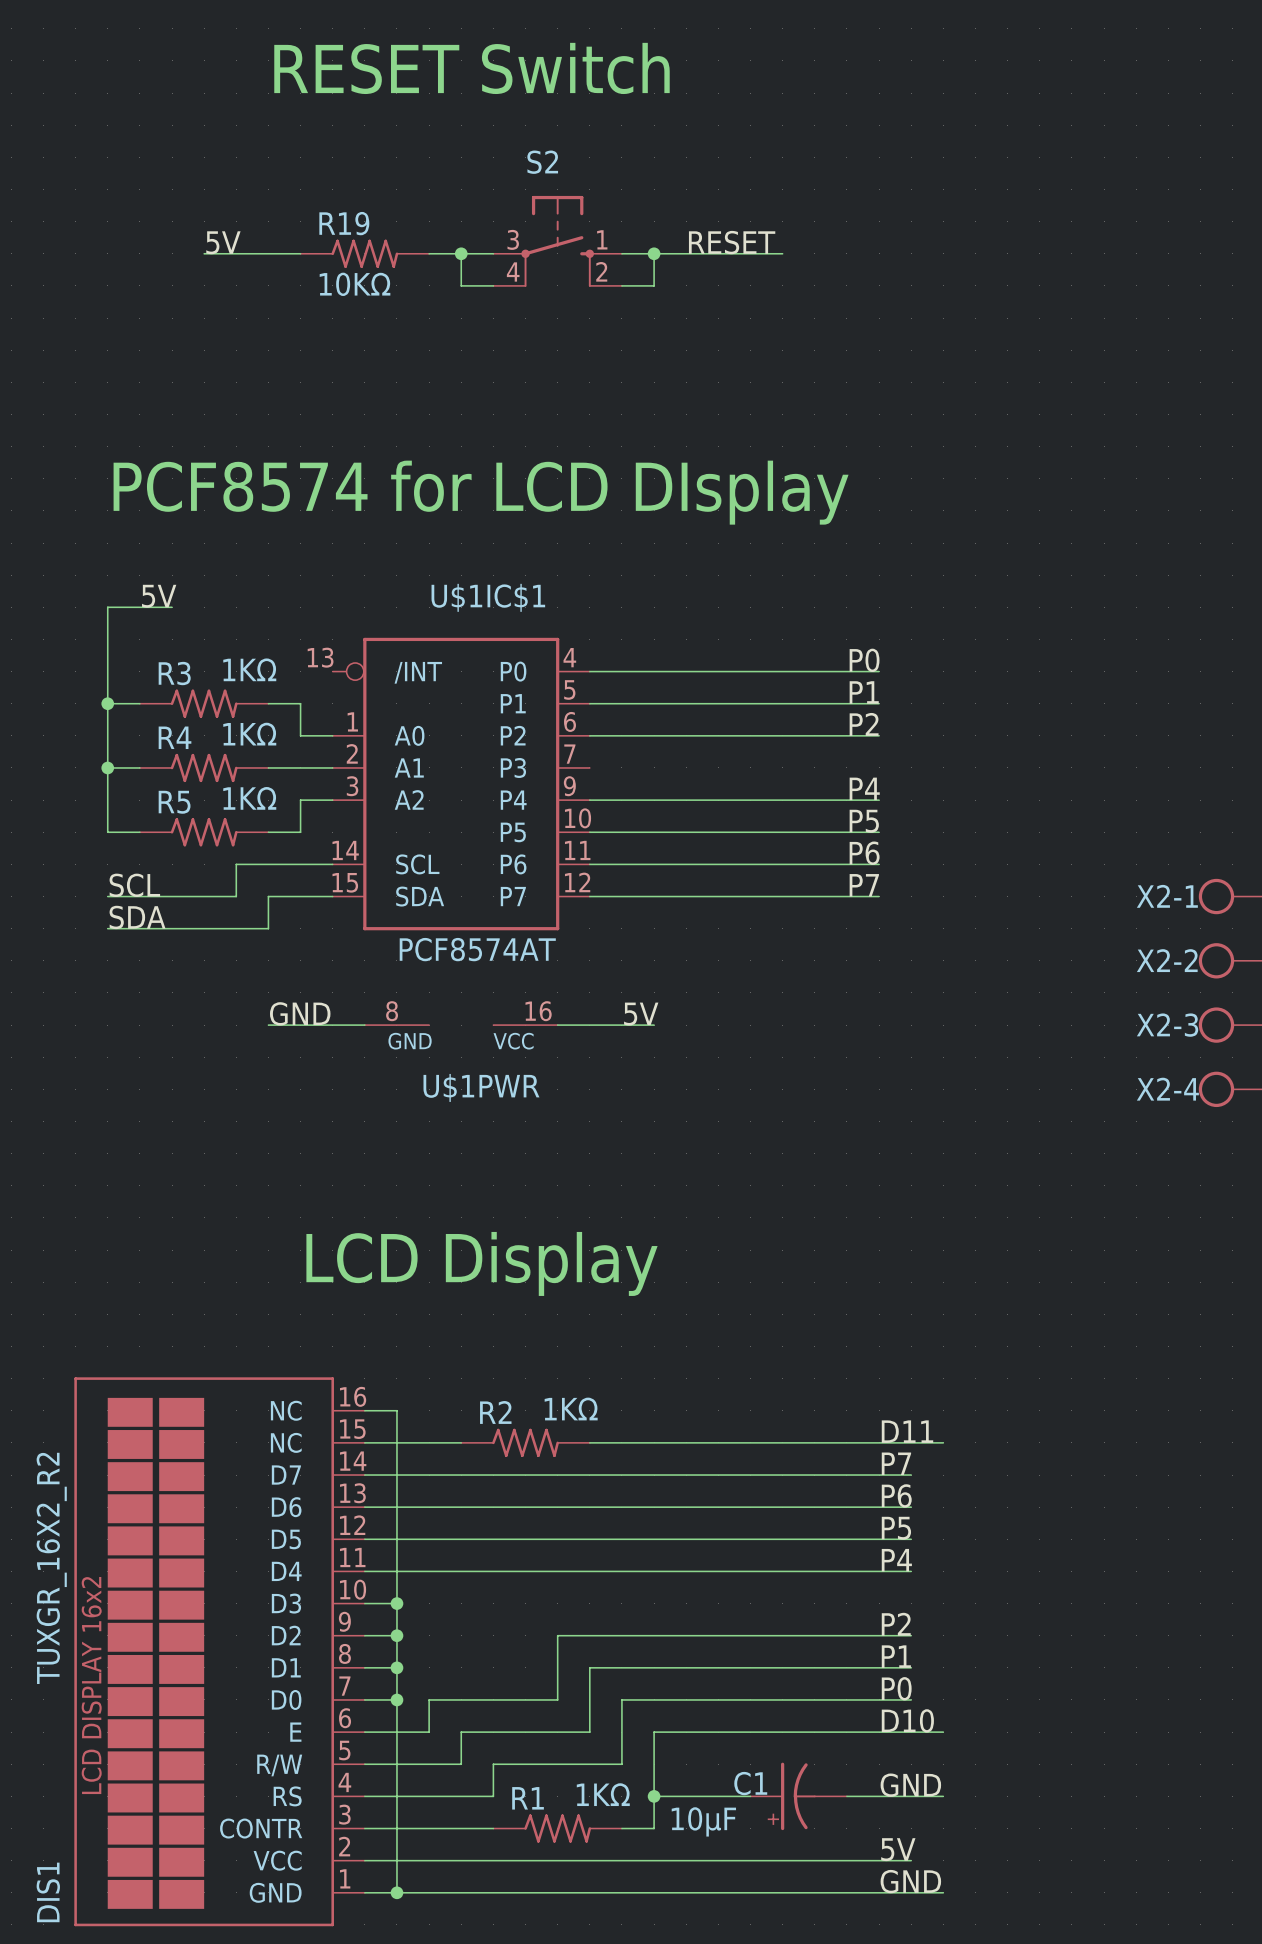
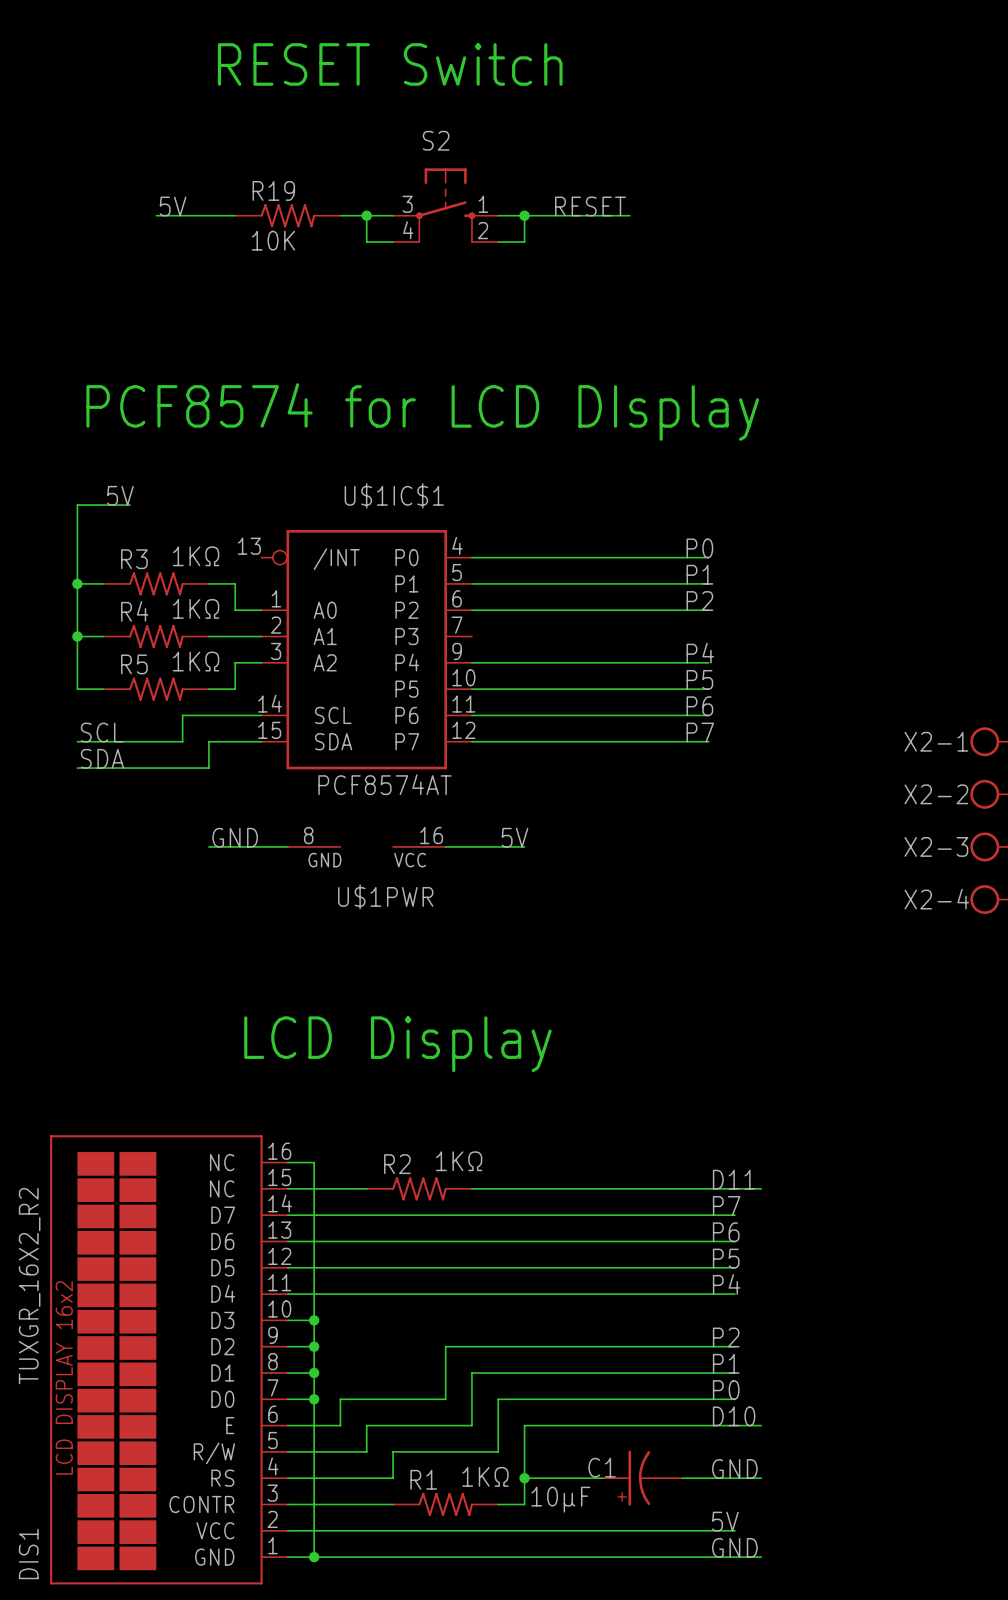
R19 value: 10KΩ (355, 284) -> 10K (273, 240)

